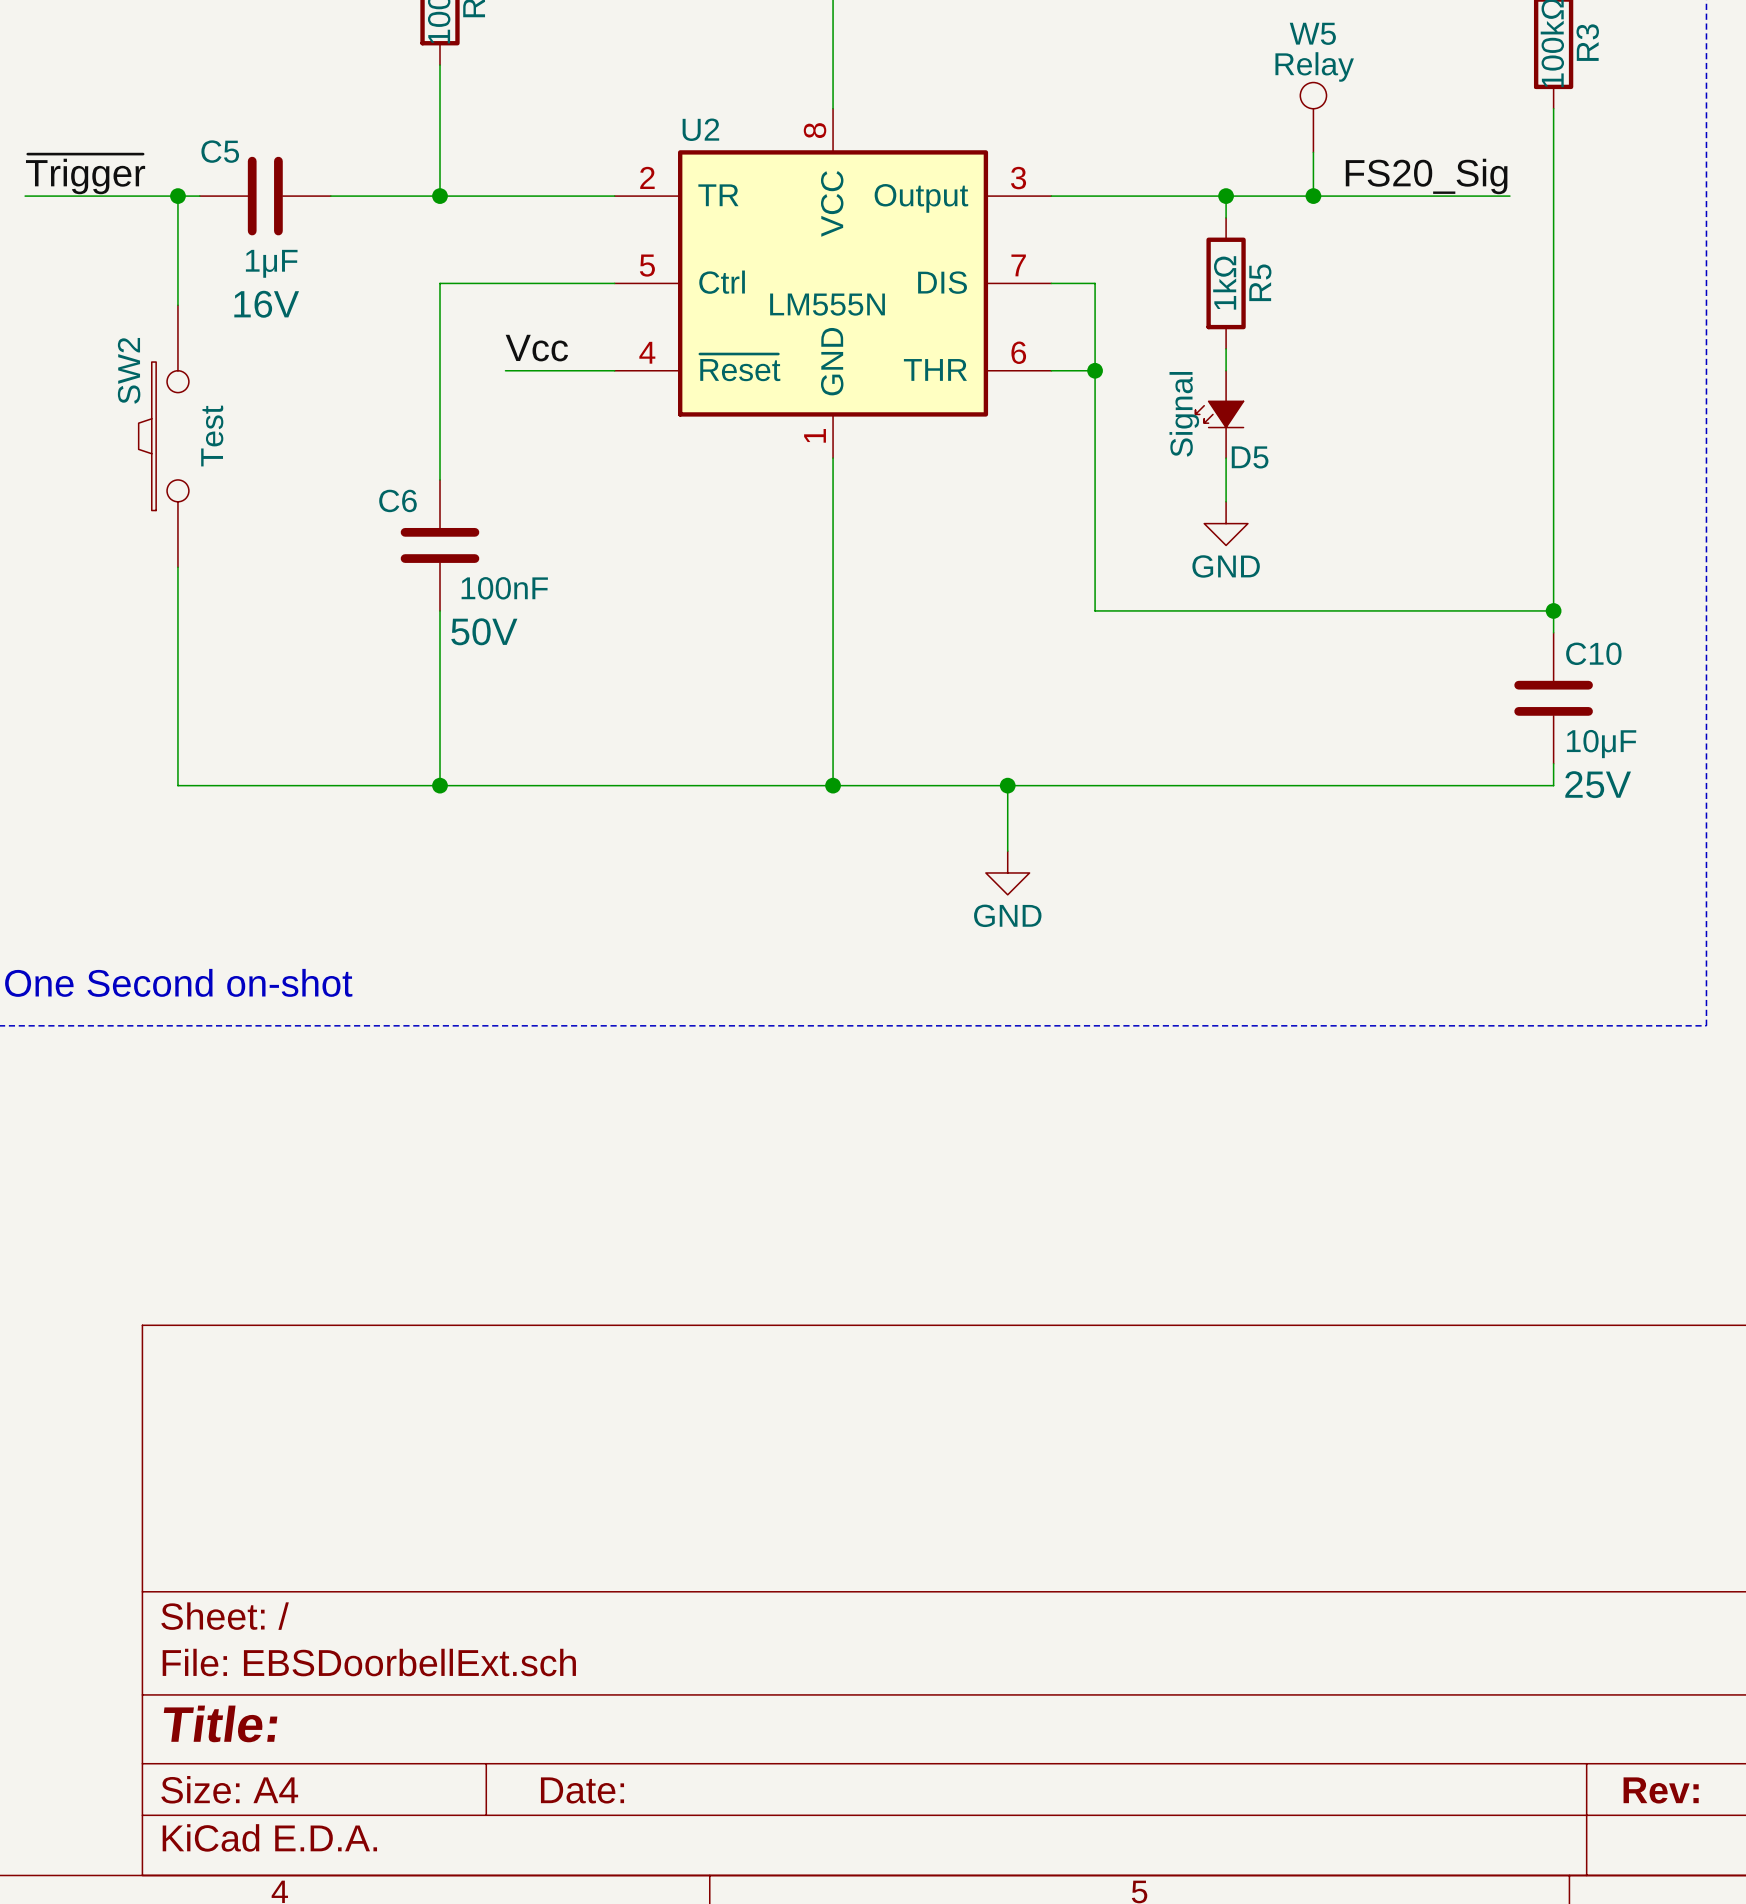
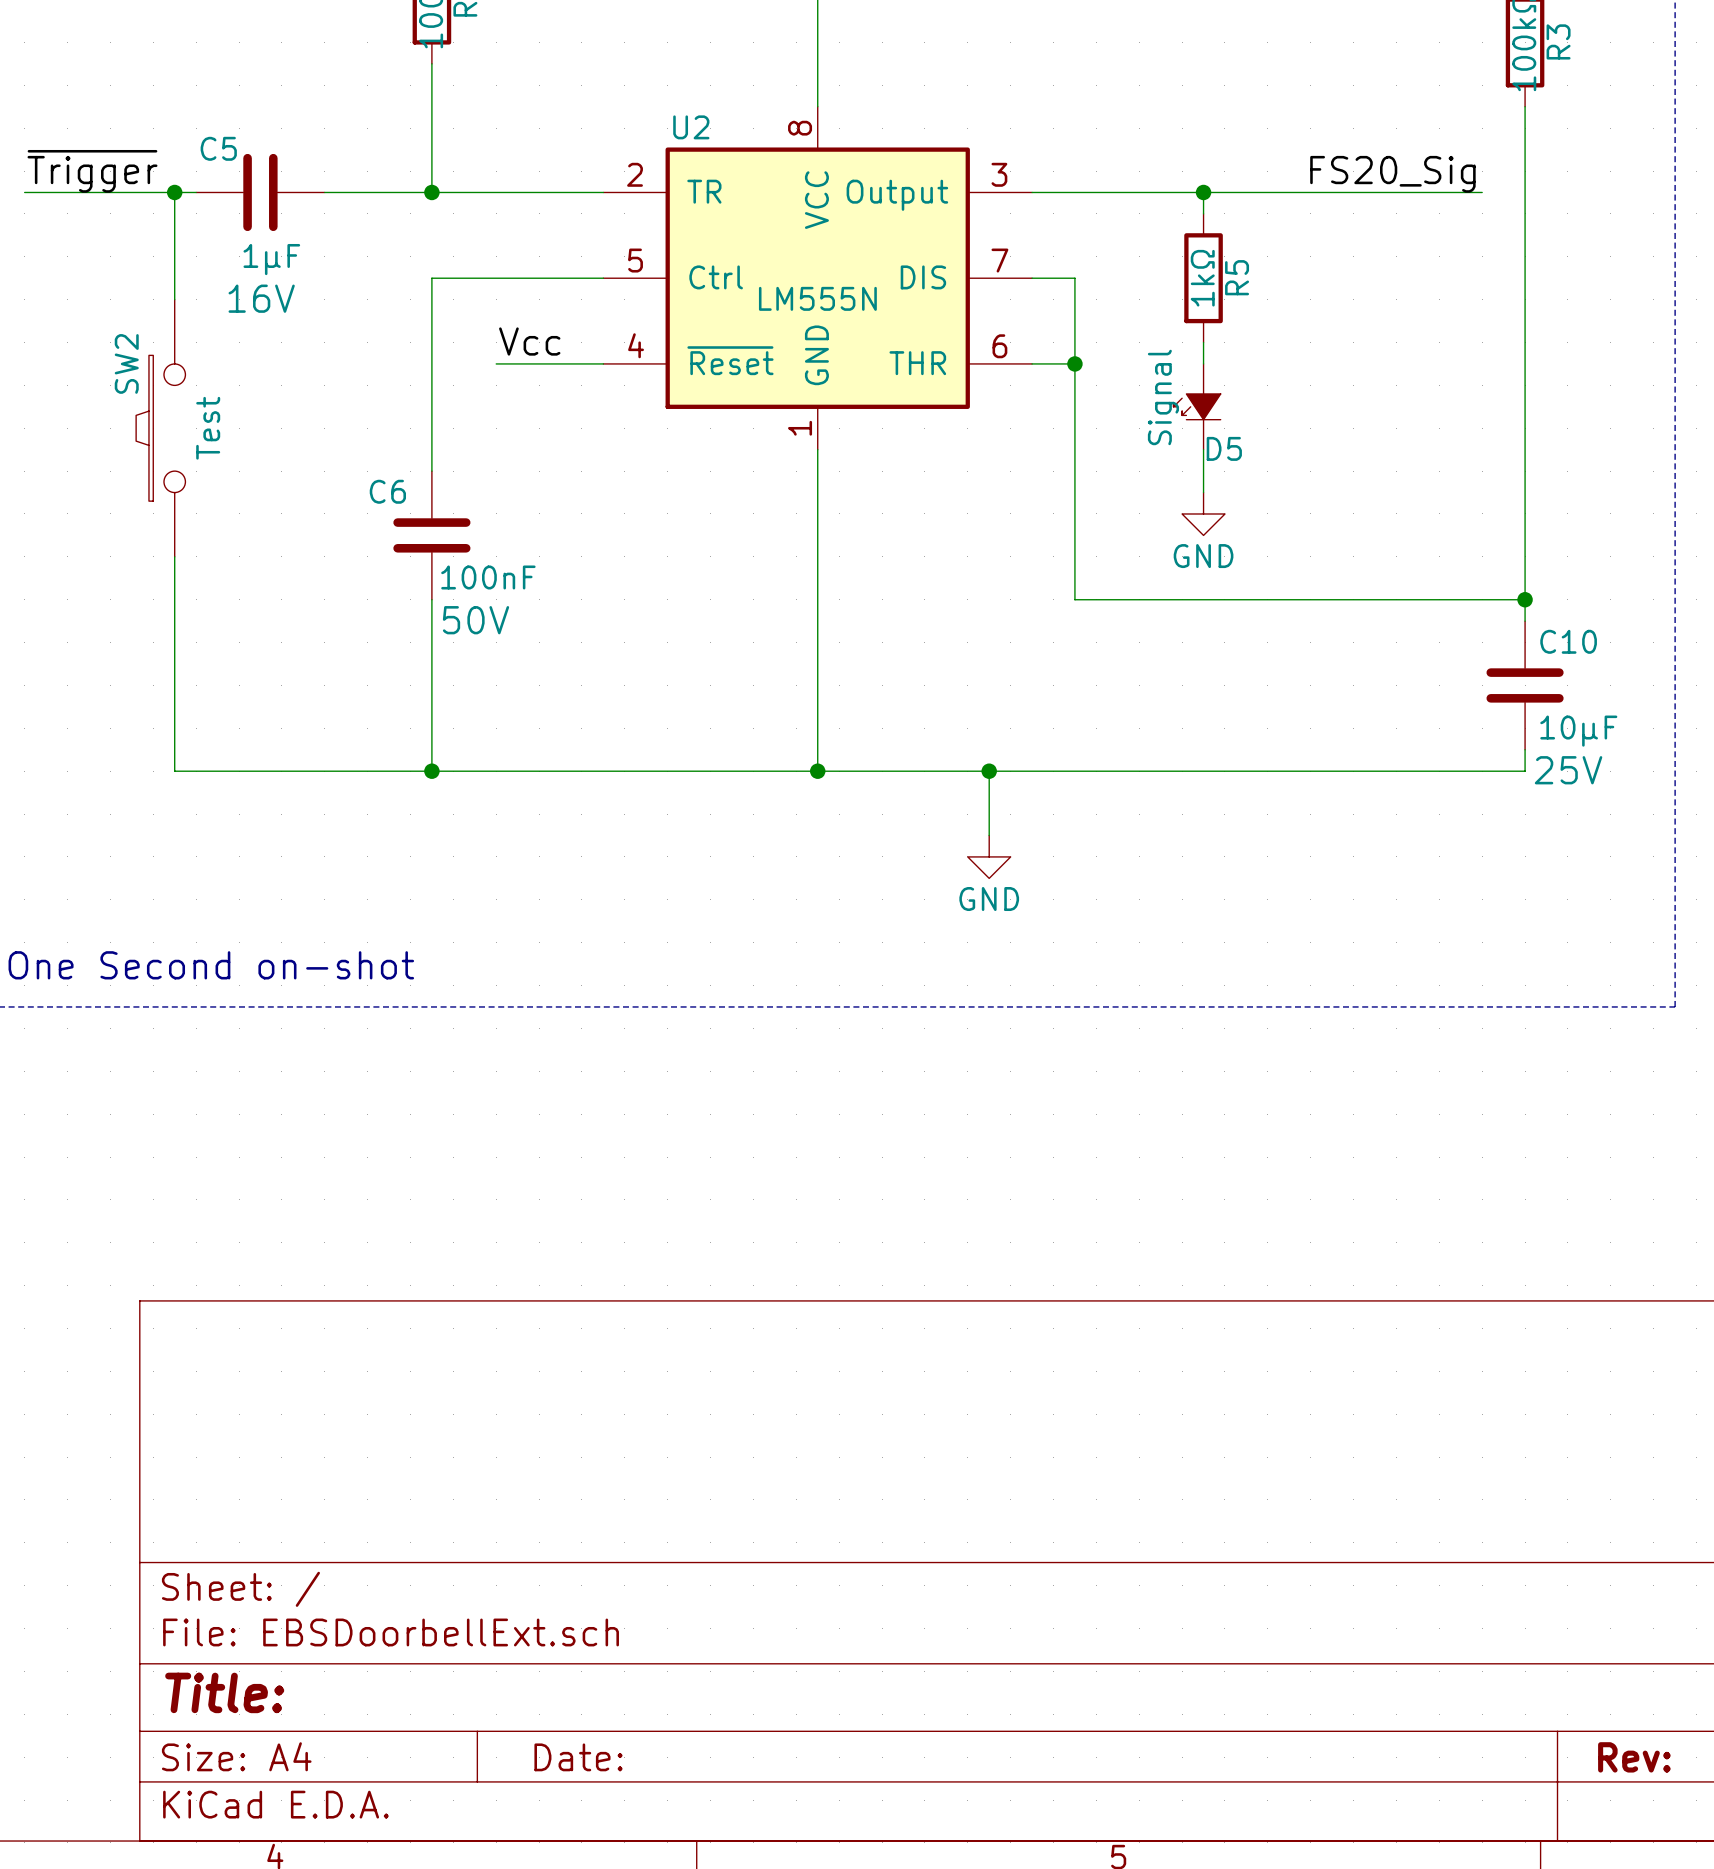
W5: Relay (1313, 117) -> none
wire: (1313, 152) (1313, 196) -> none
junction: (1313, 196) -> none

